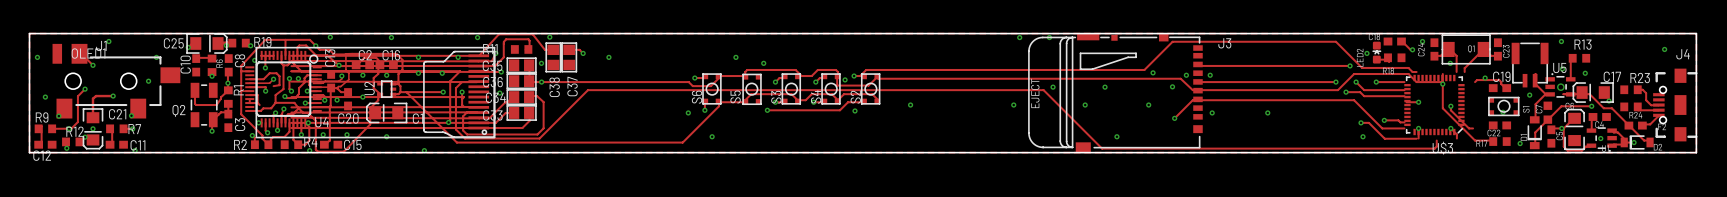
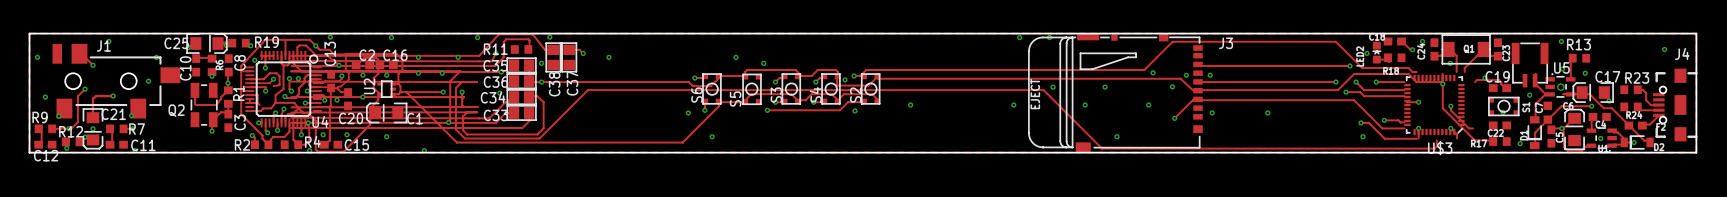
OLED1: (375, 92) -> none

